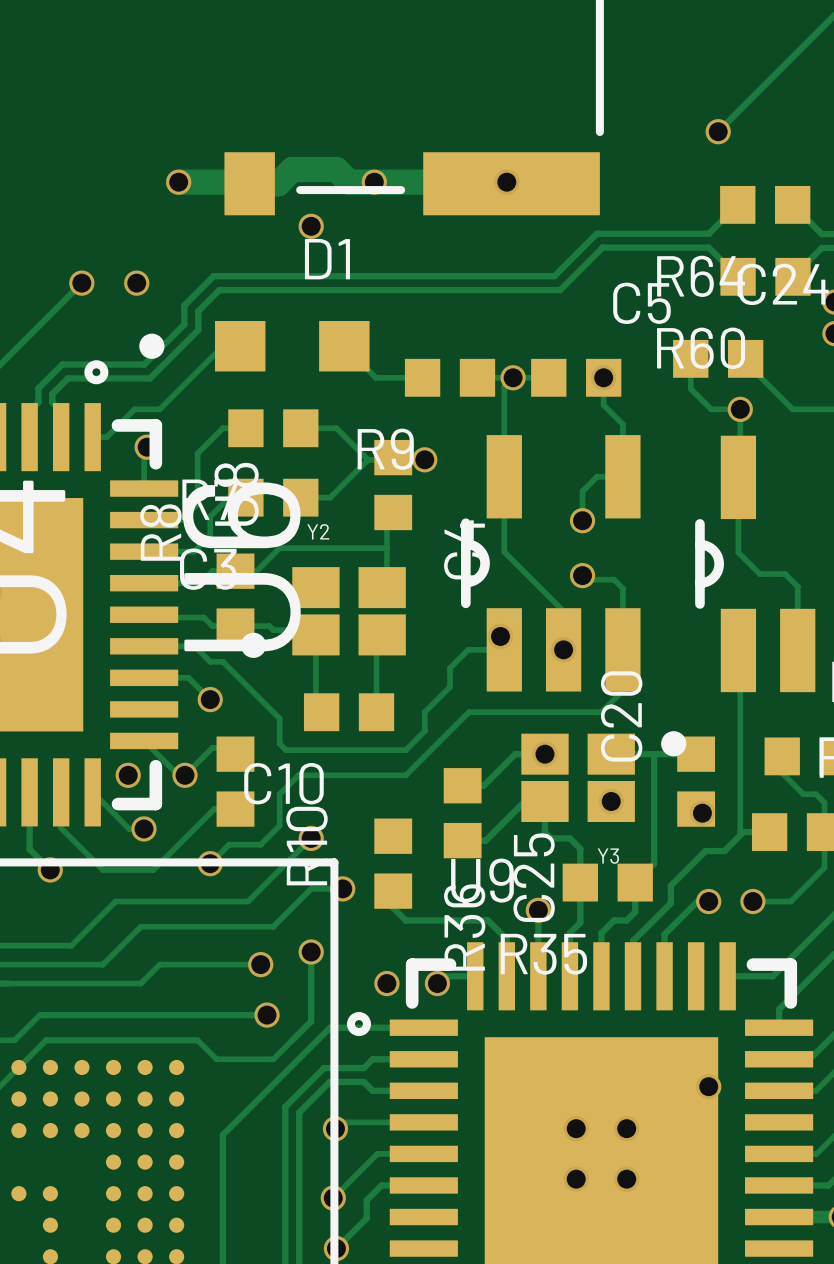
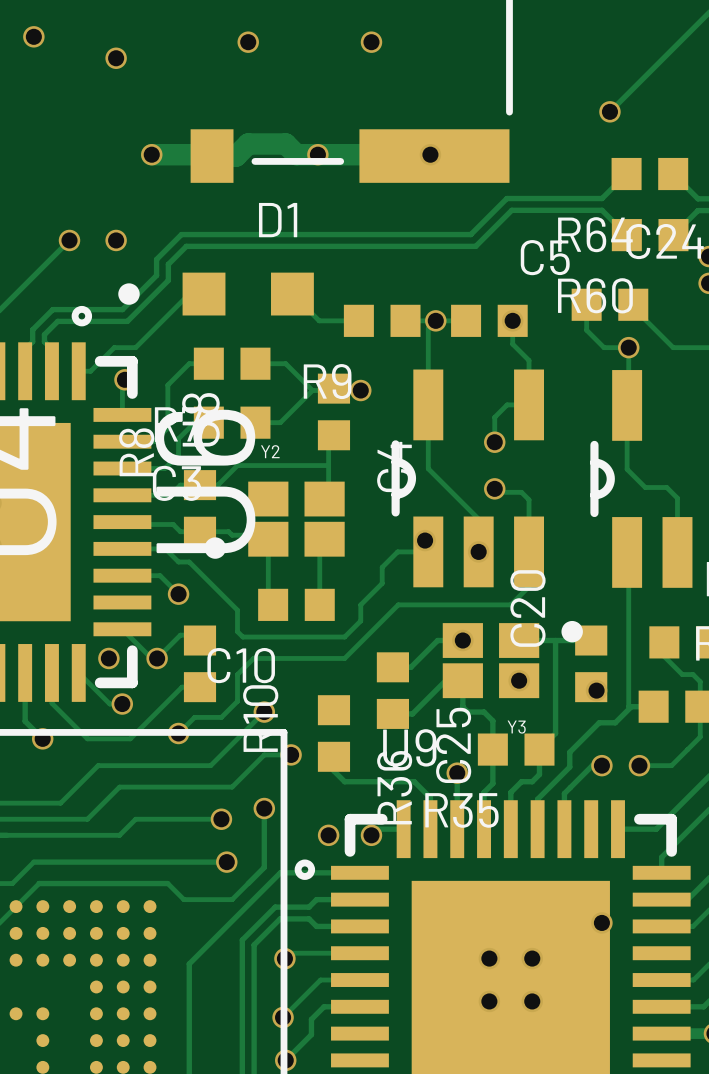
via: none -> (33, 36)
via: none -> (248, 42)
via: none -> (371, 42)
via: none -> (116, 58)
via: (311, 226) -> none

